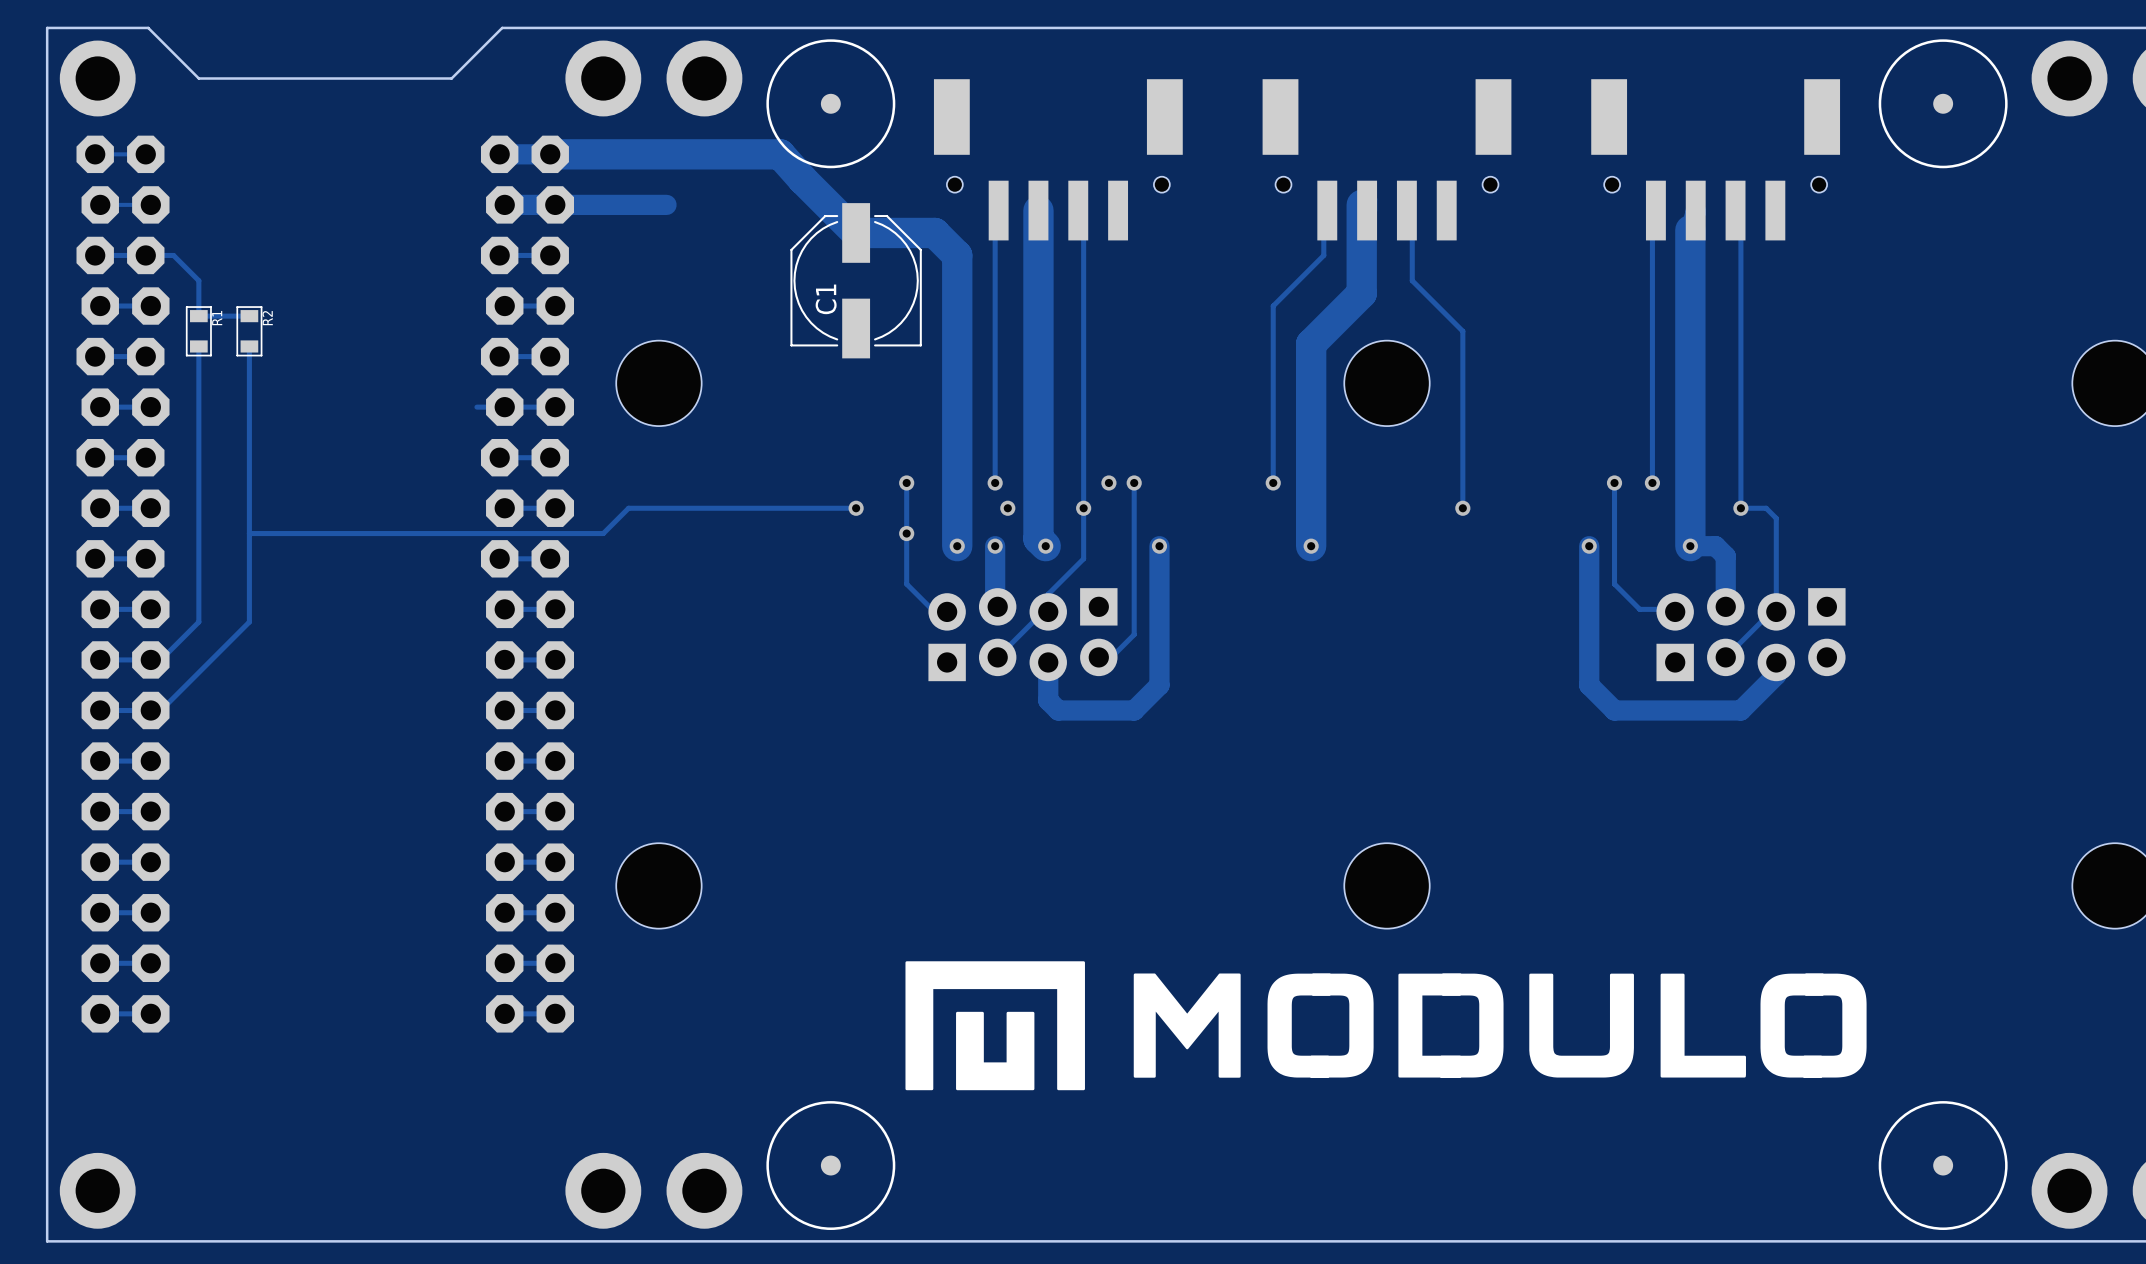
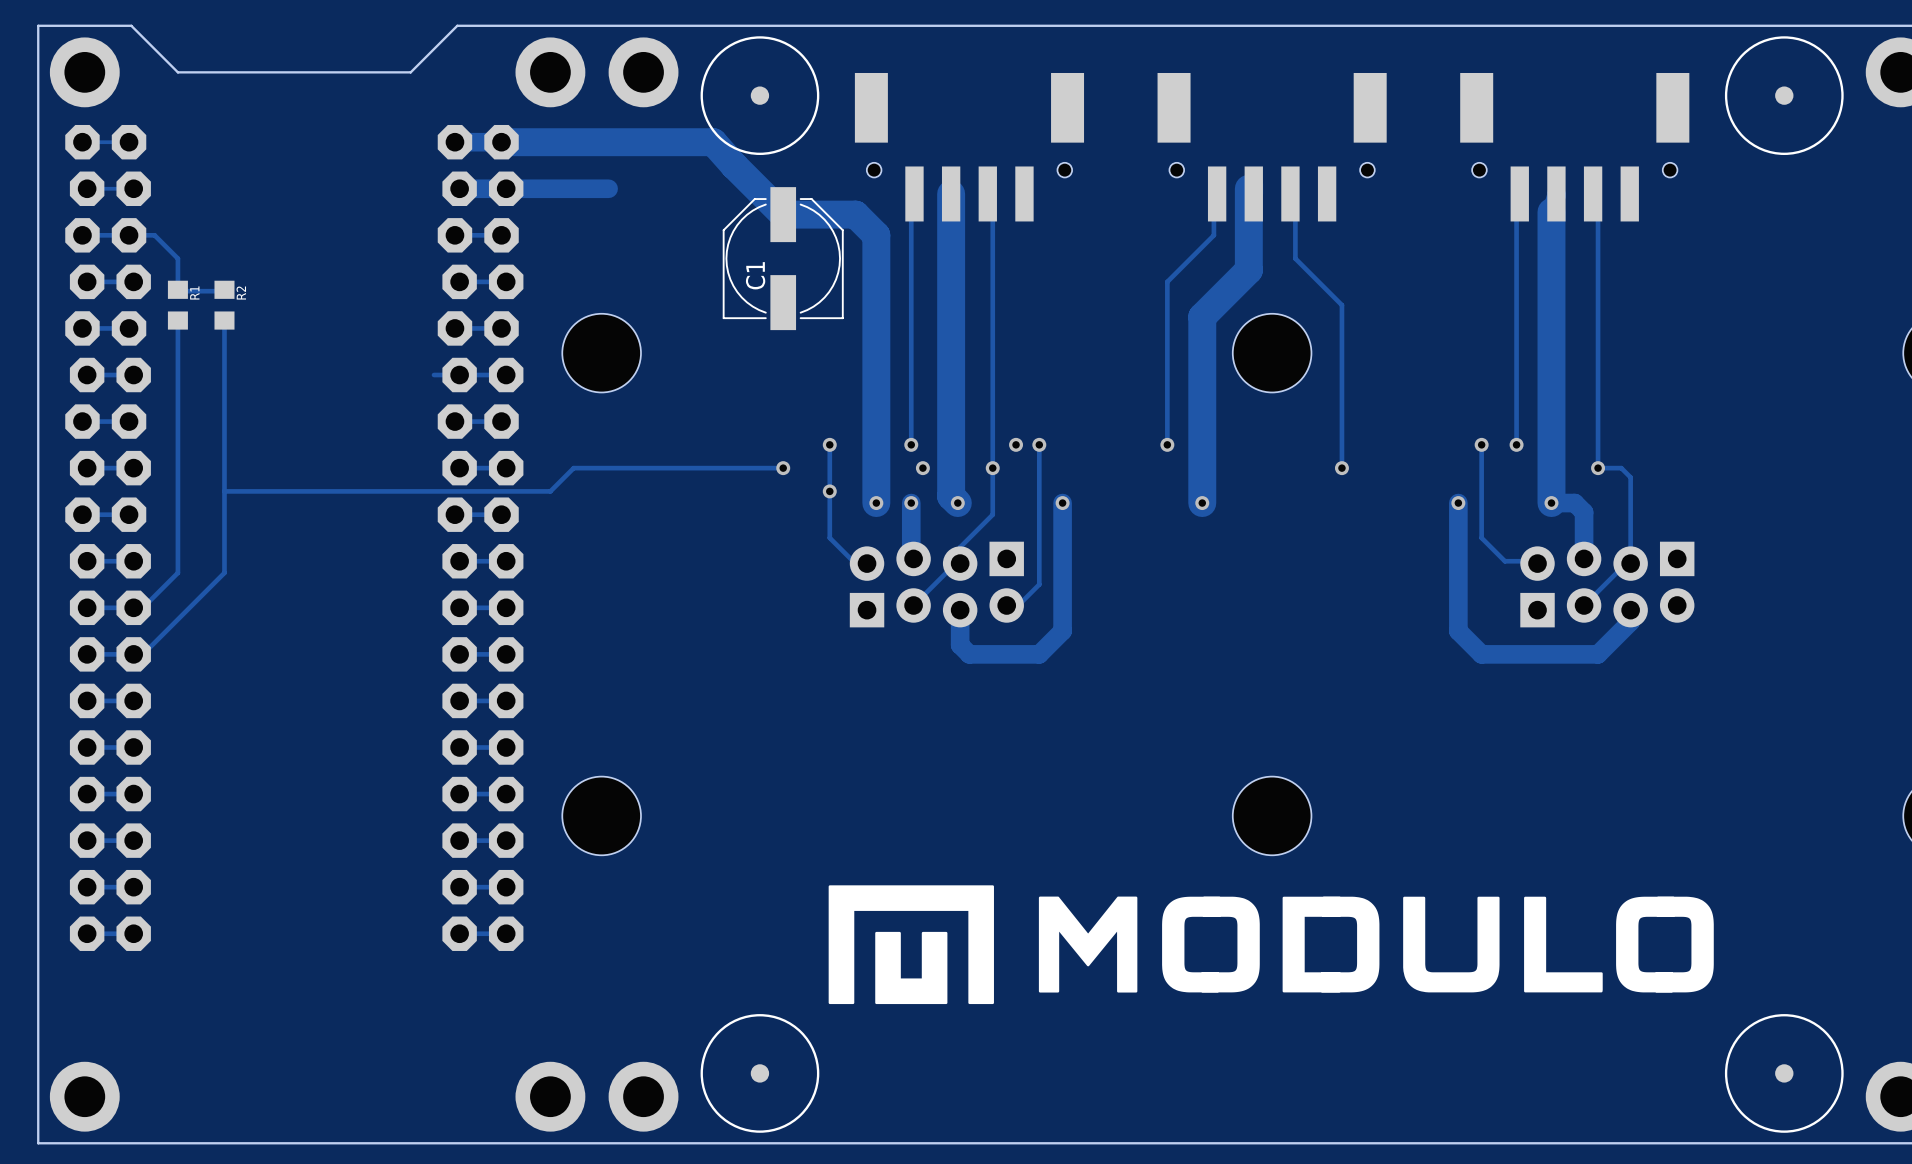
R1 footprint: [185, 306, 212, 357] -> [167, 280, 188, 330]
R2 footprint: [236, 306, 263, 357] -> [214, 280, 235, 330]

